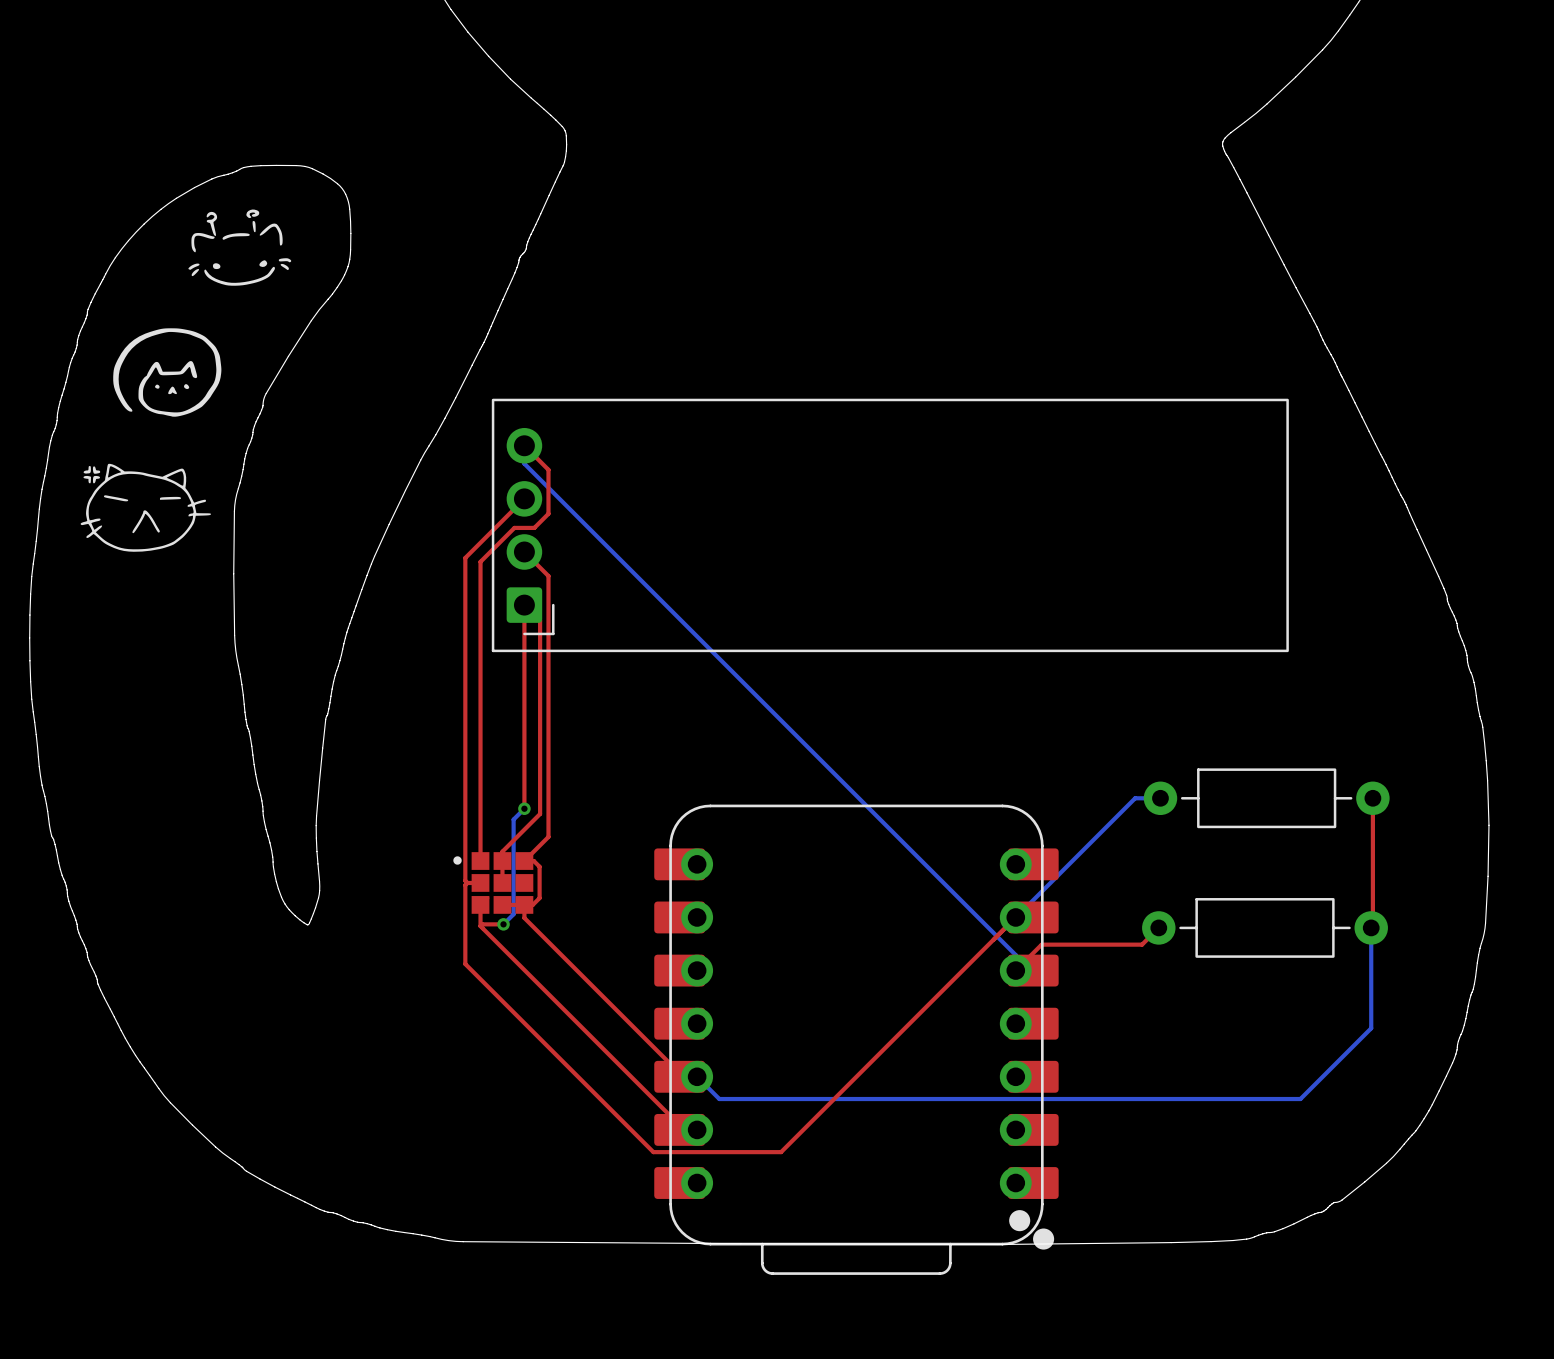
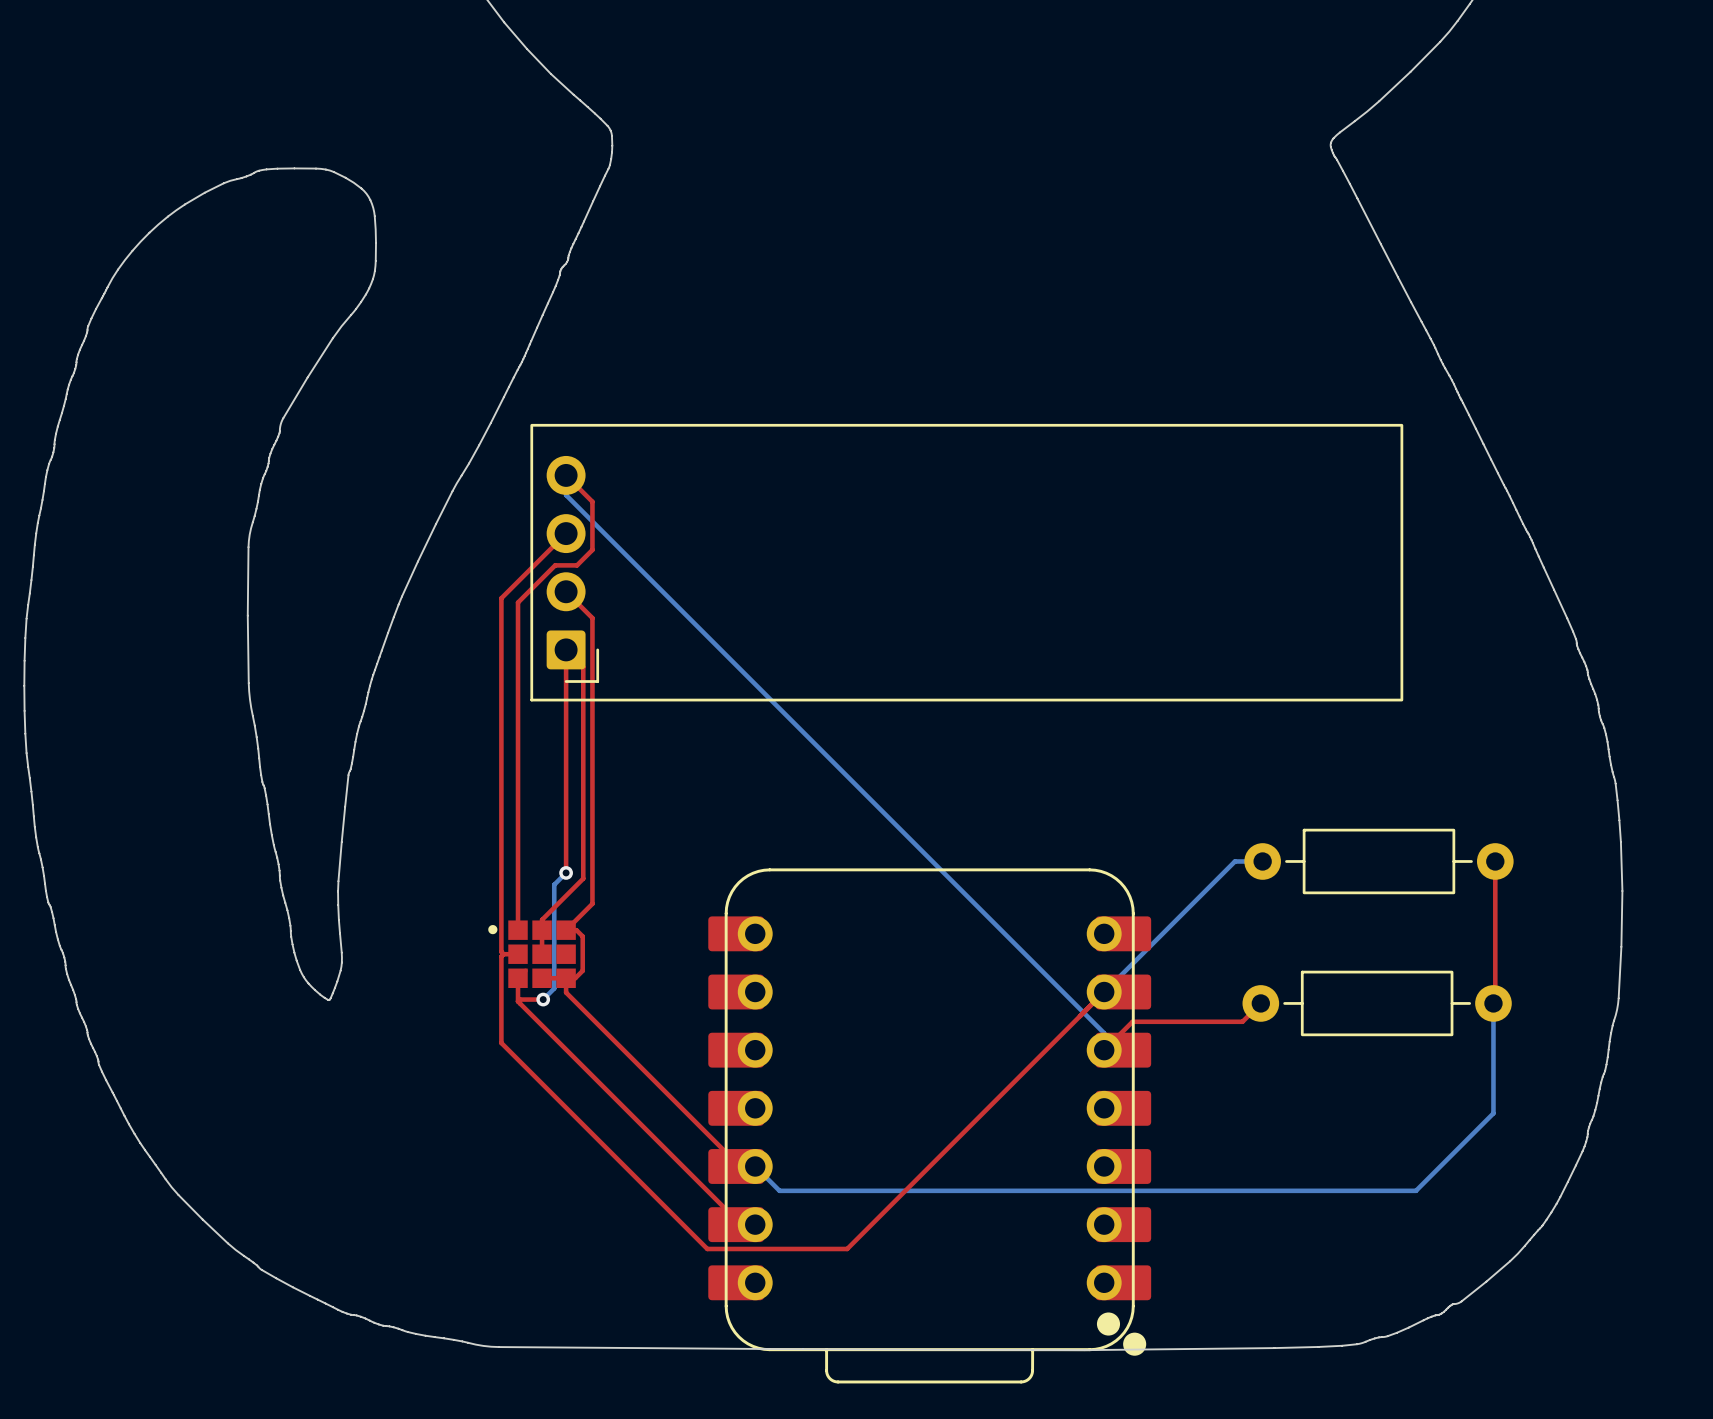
drawing: [188, 209, 292, 286] -> none
drawing: [113, 328, 222, 417] -> none
drawing: [80, 463, 211, 552] -> none

